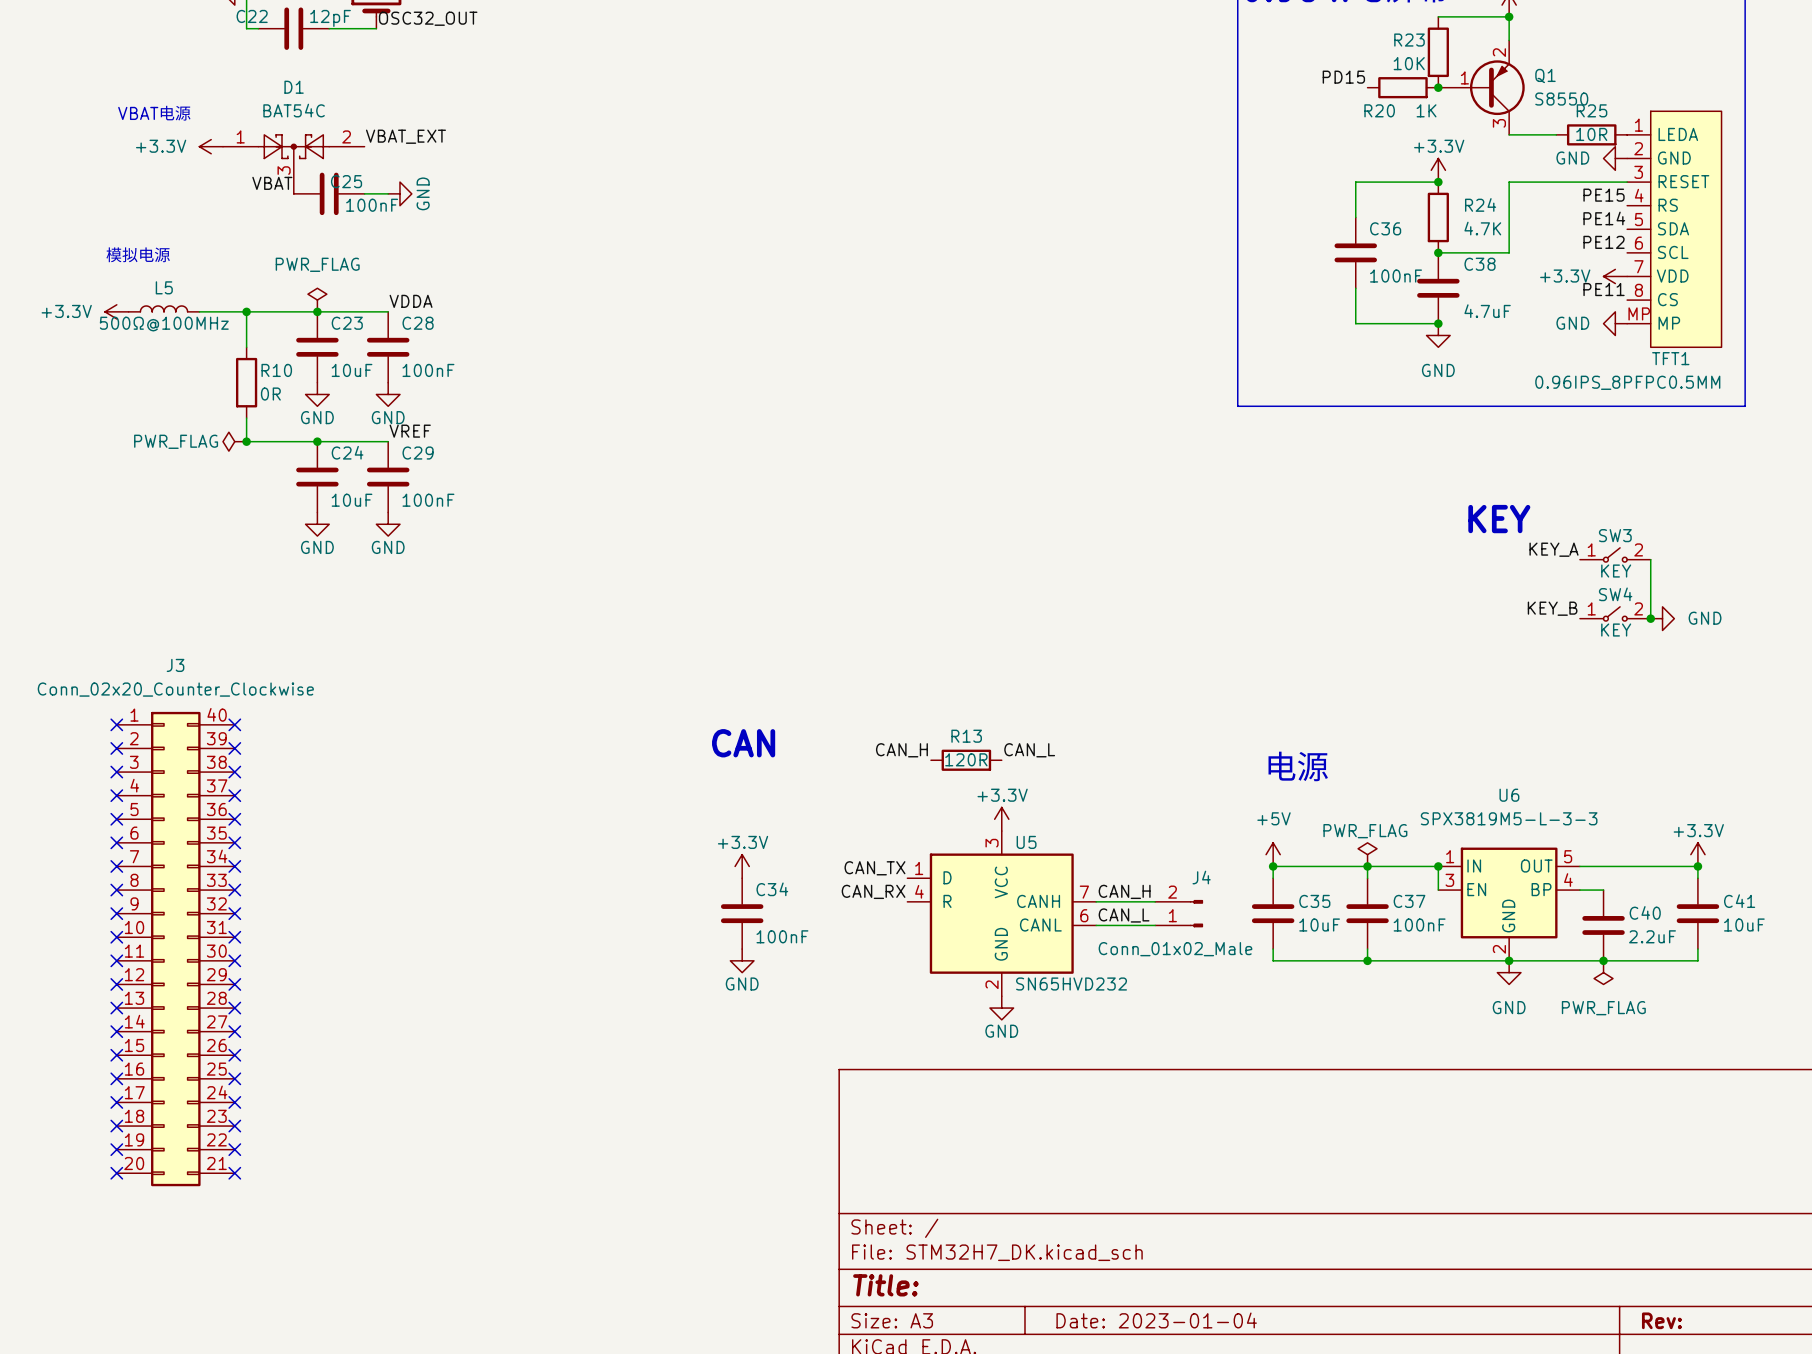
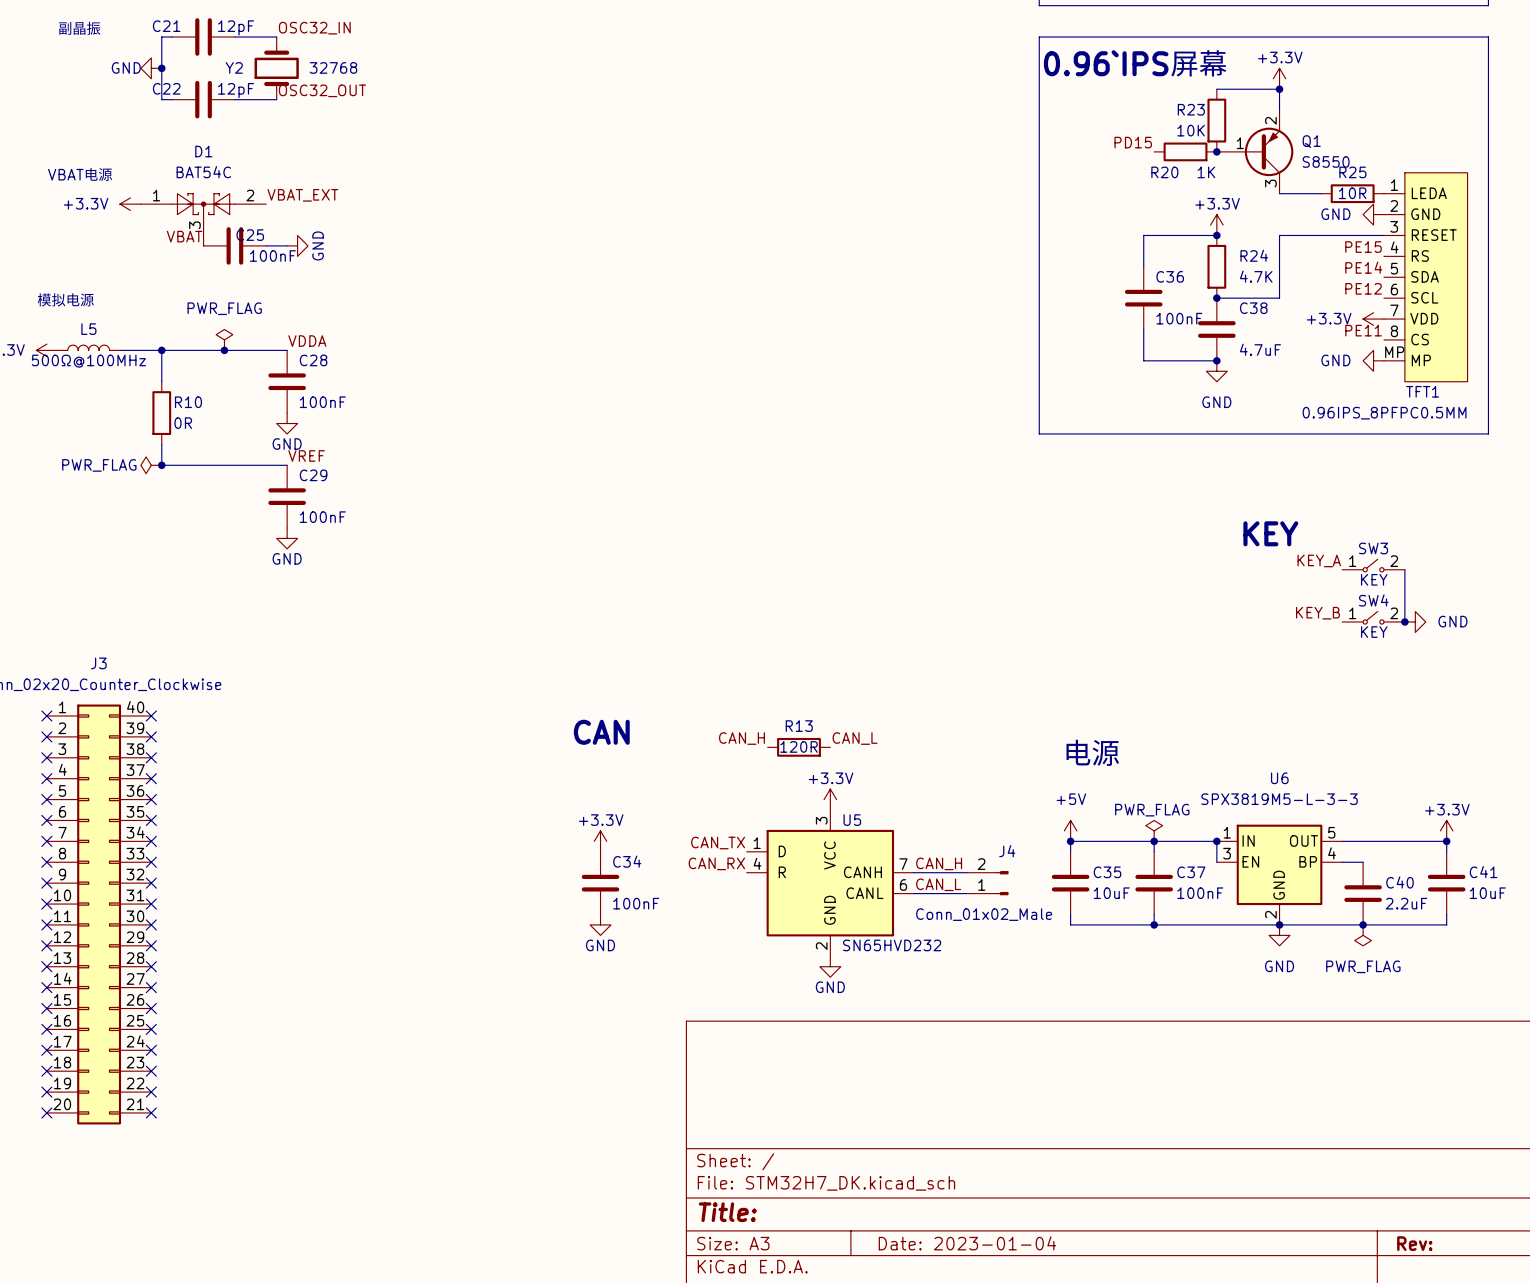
C23: 10uF (317, 347) -> none
power symbol: GND (317, 394) -> none
junction: (317, 441) -> none
C24: 10uF (317, 477) -> none
power symbol: GND (317, 524) -> none

